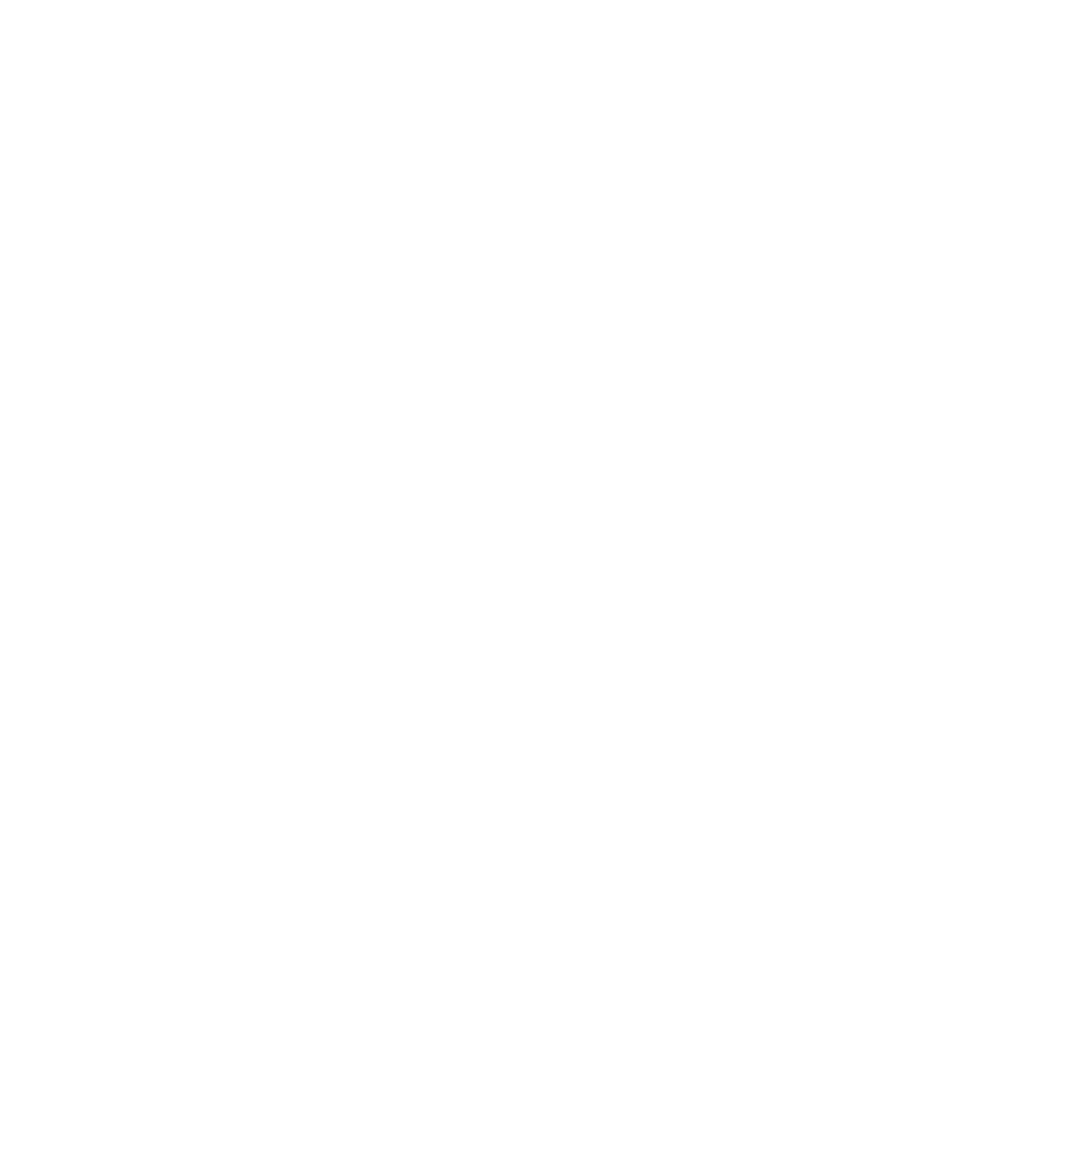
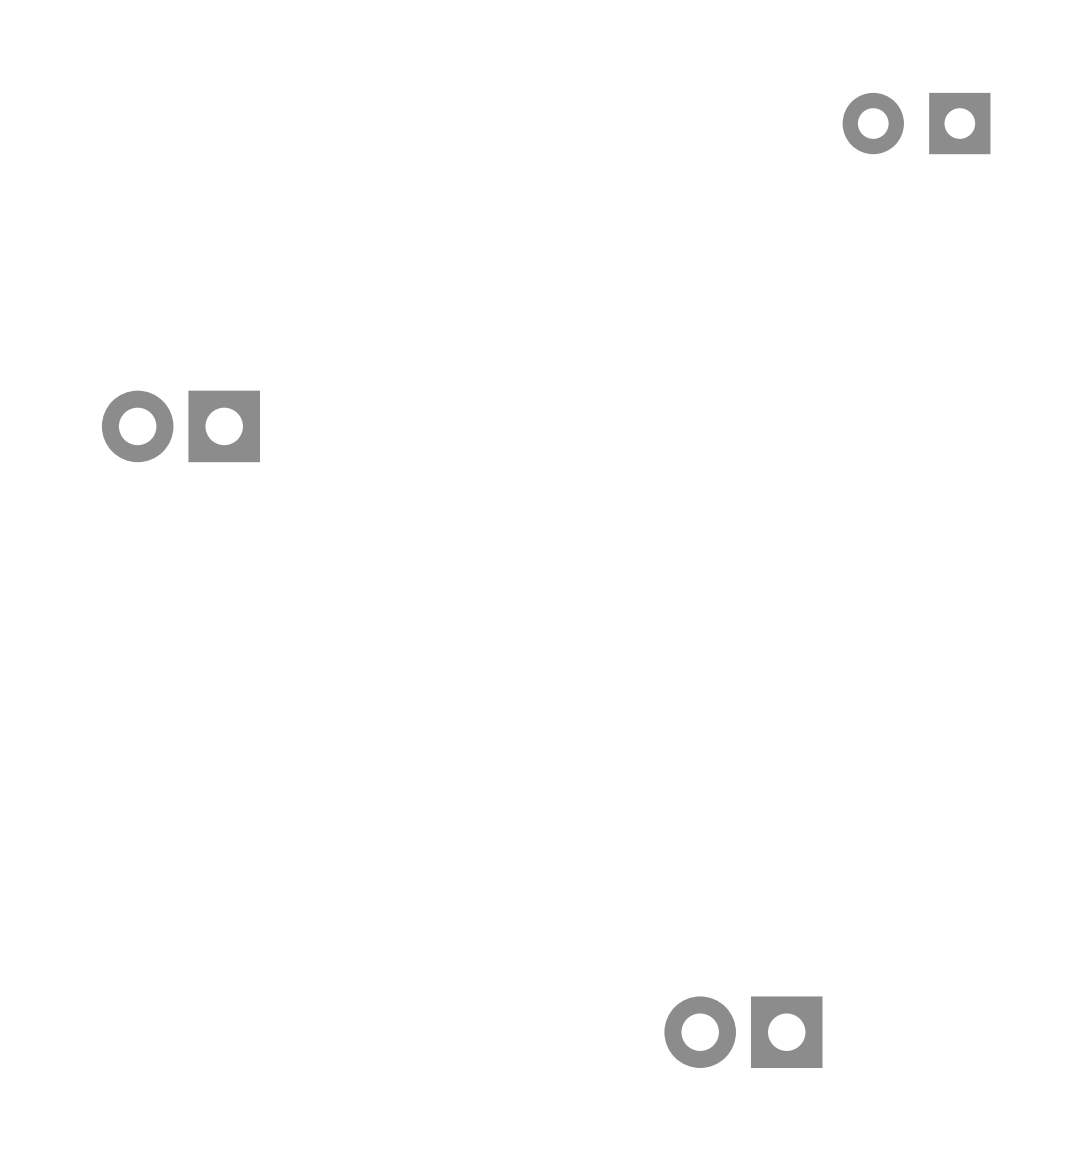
part: none -> (916, 123)
part: none -> (180, 426)
part: none -> (743, 1032)

